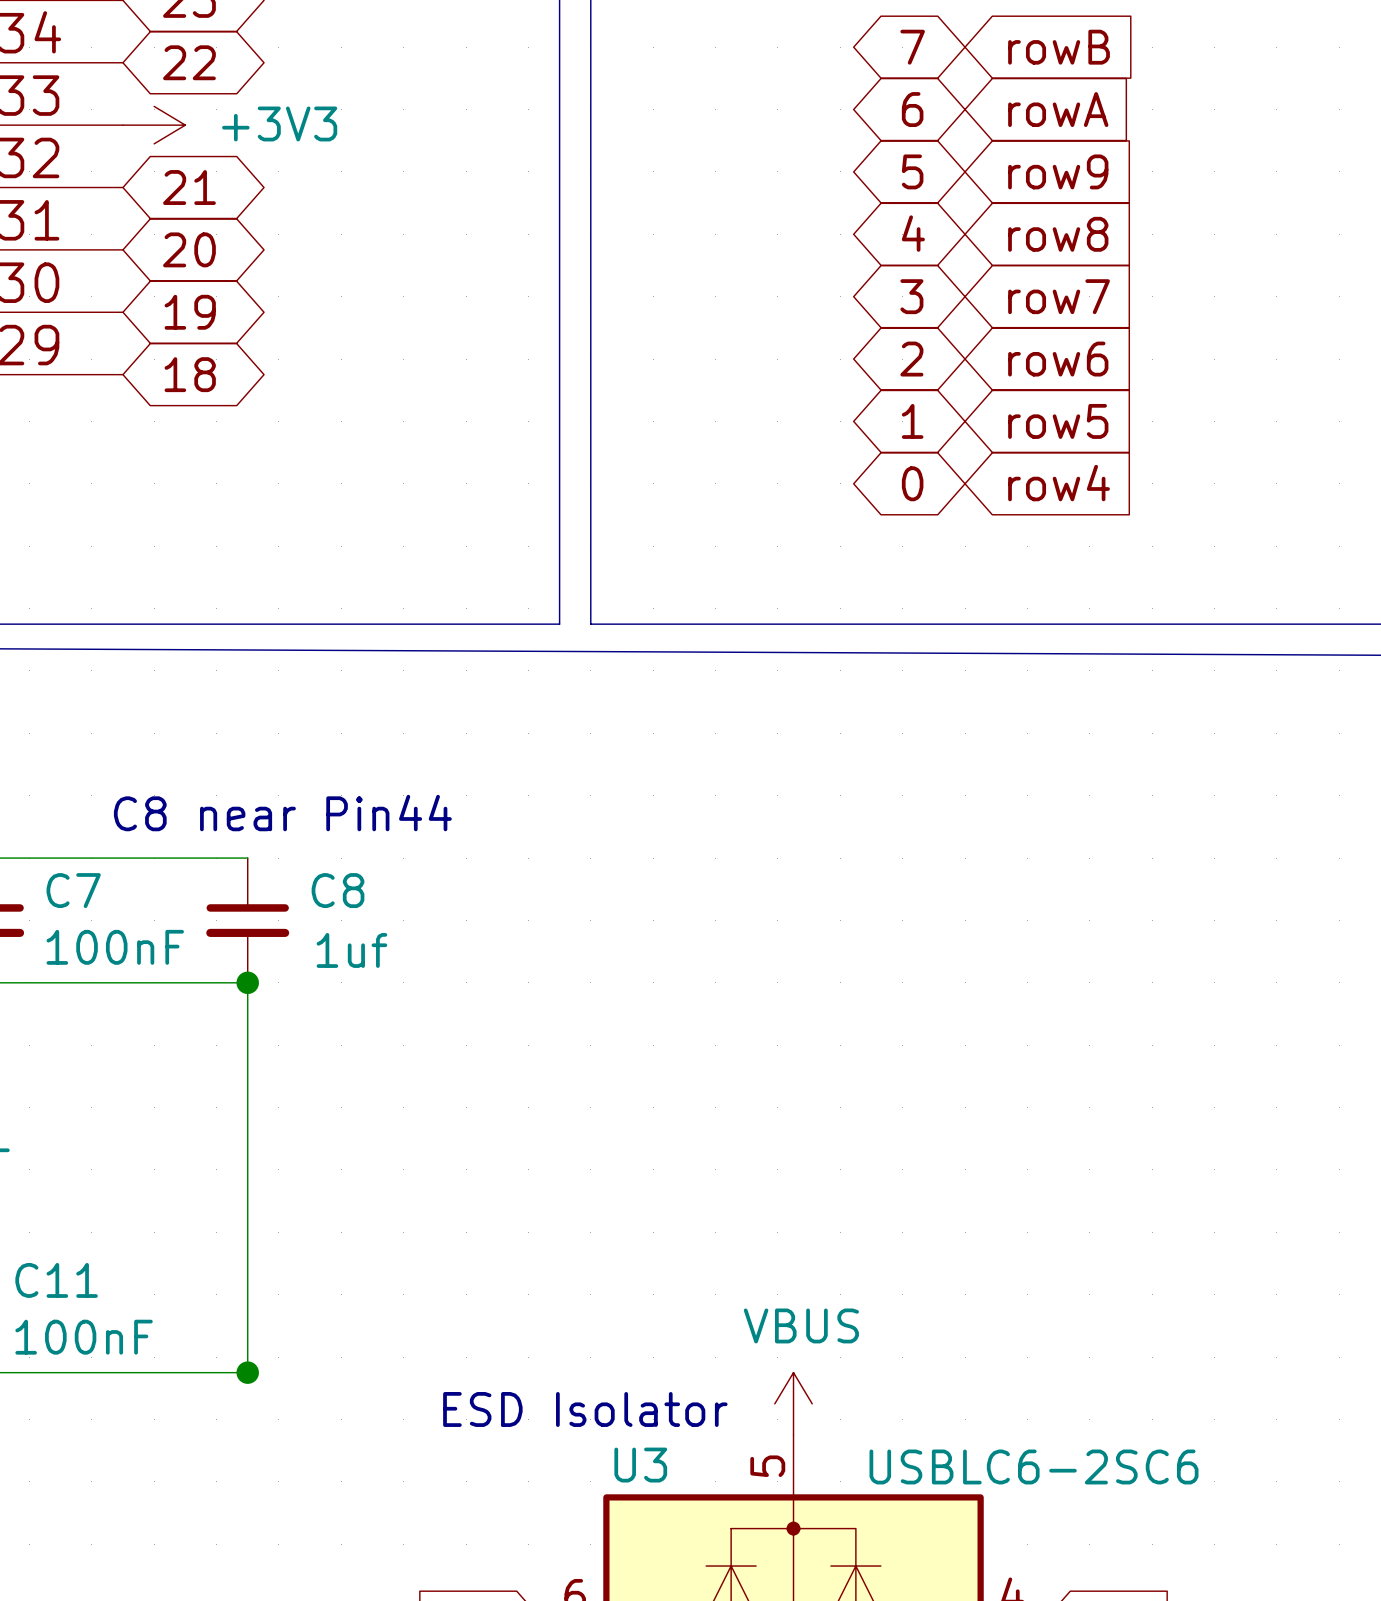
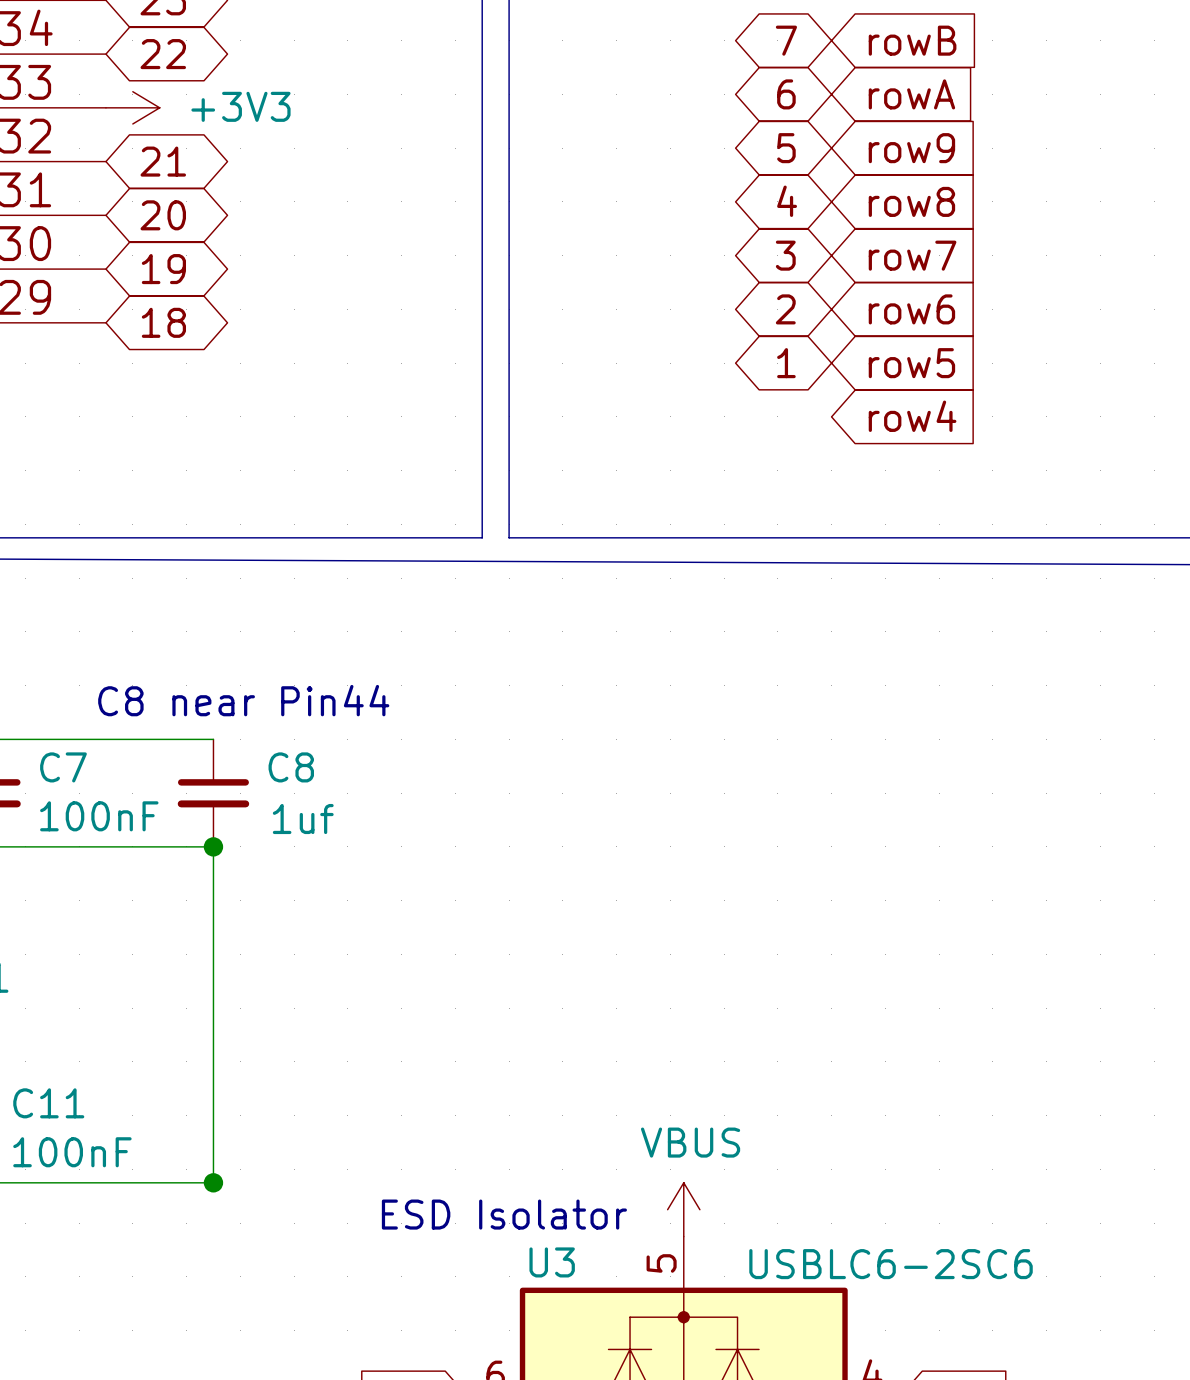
global label: 0 (912, 483) -> none

